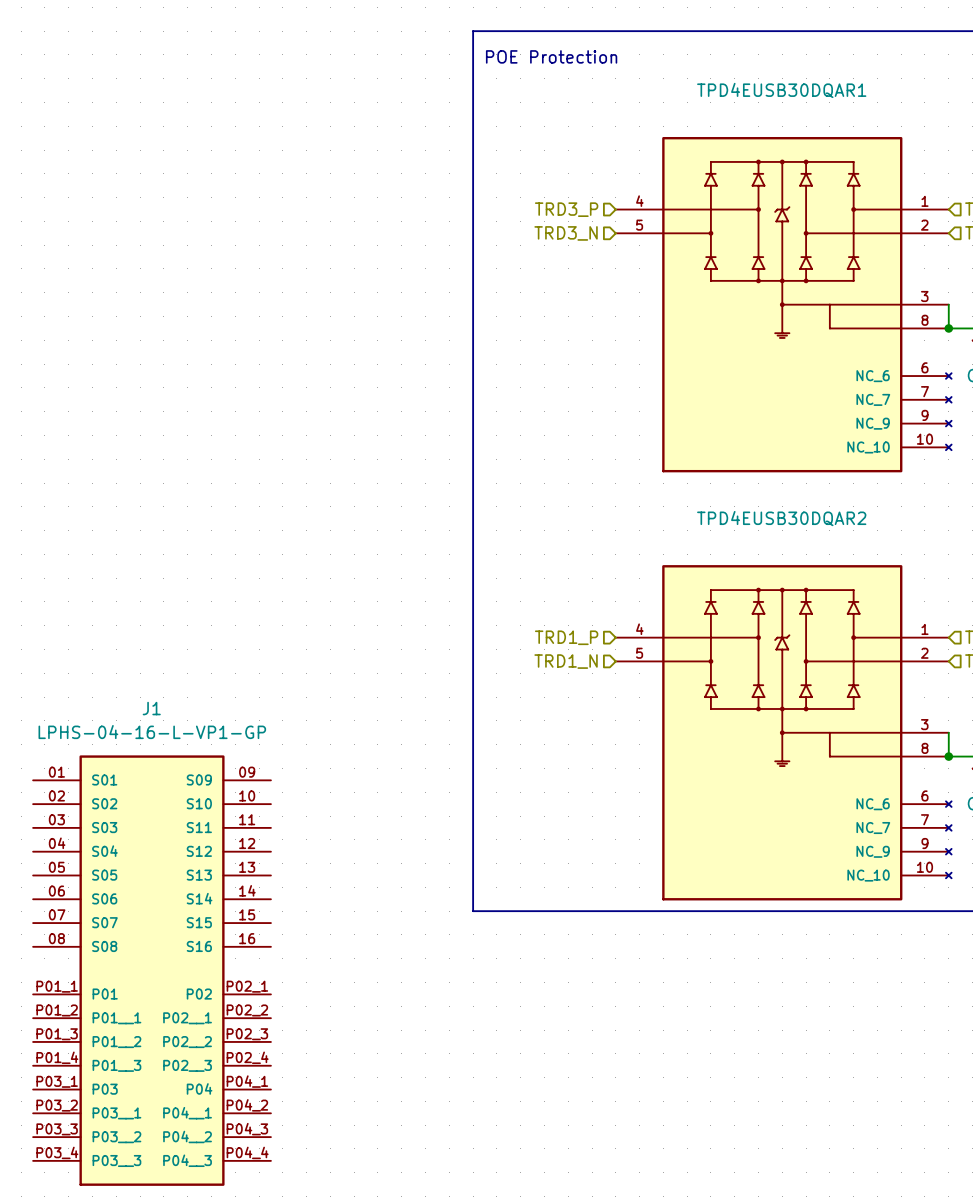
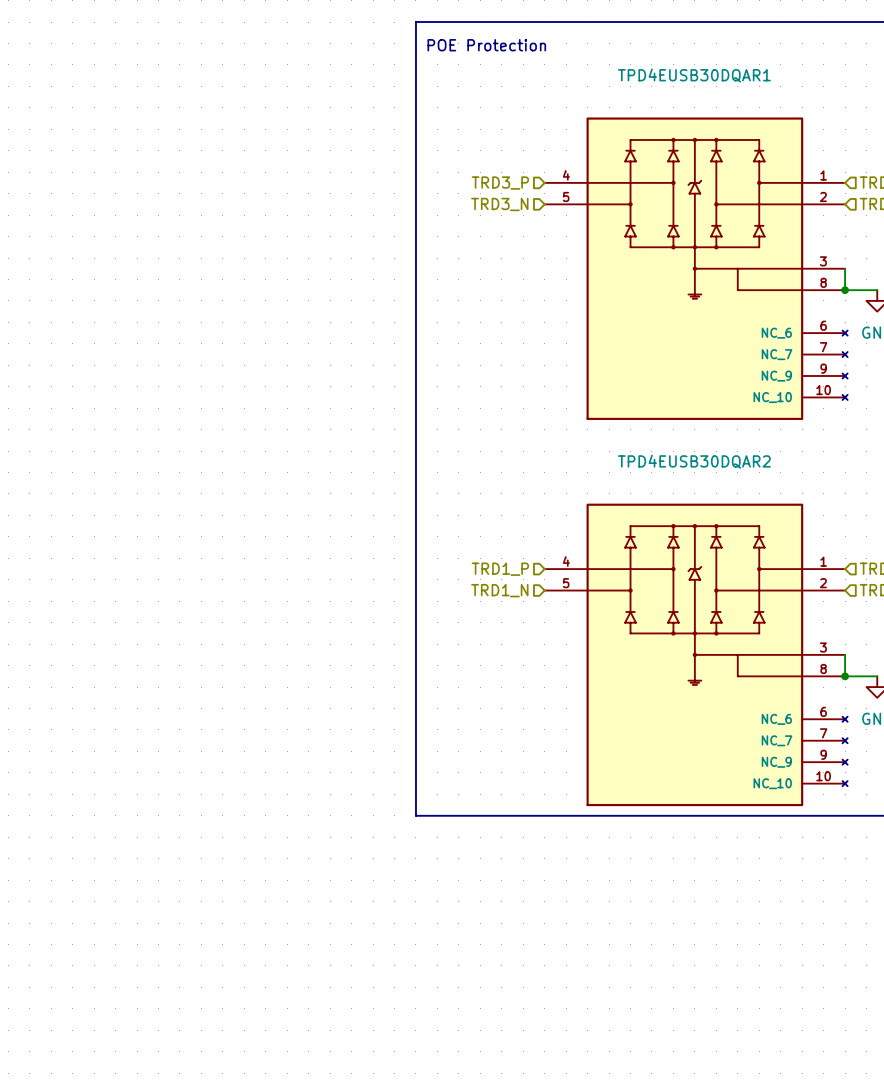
J1: LPHS-04-16-L-VP1-GP (152, 970) -> none

